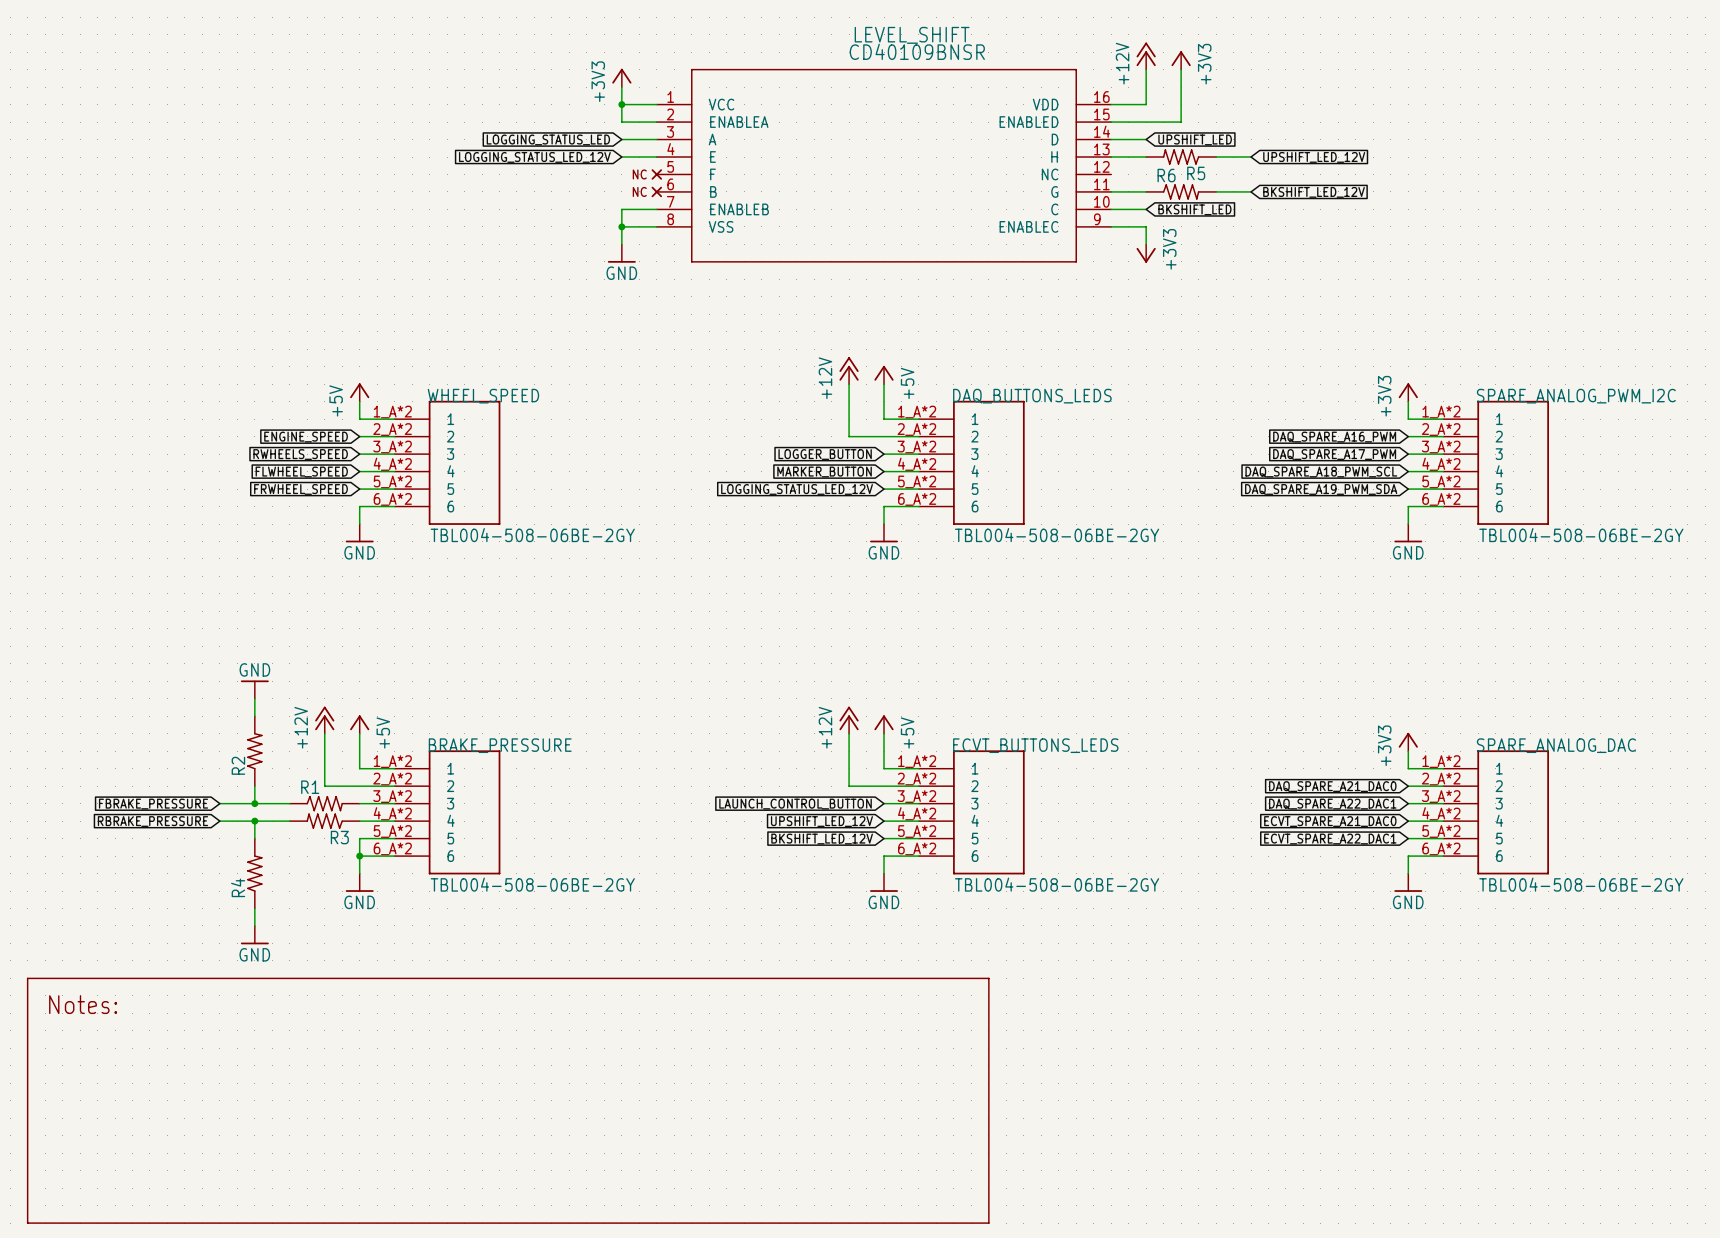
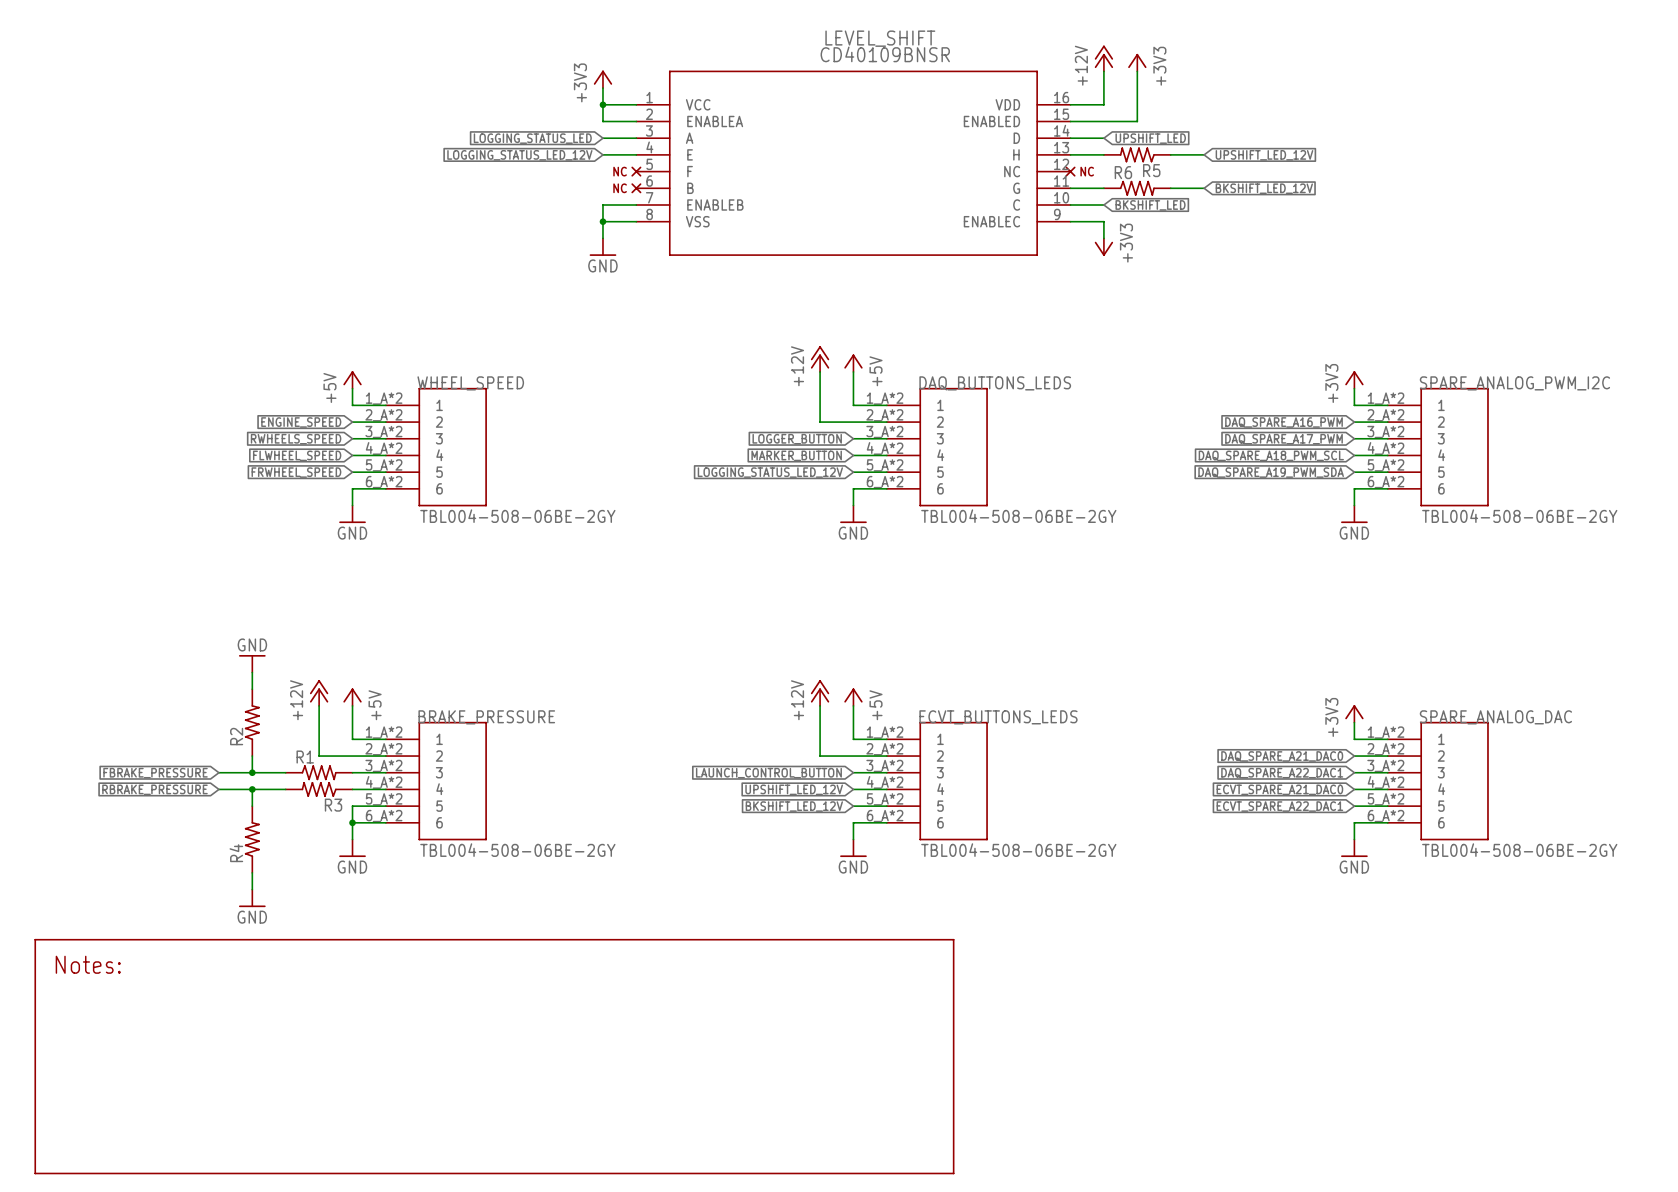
part: none -> (1070, 171)

